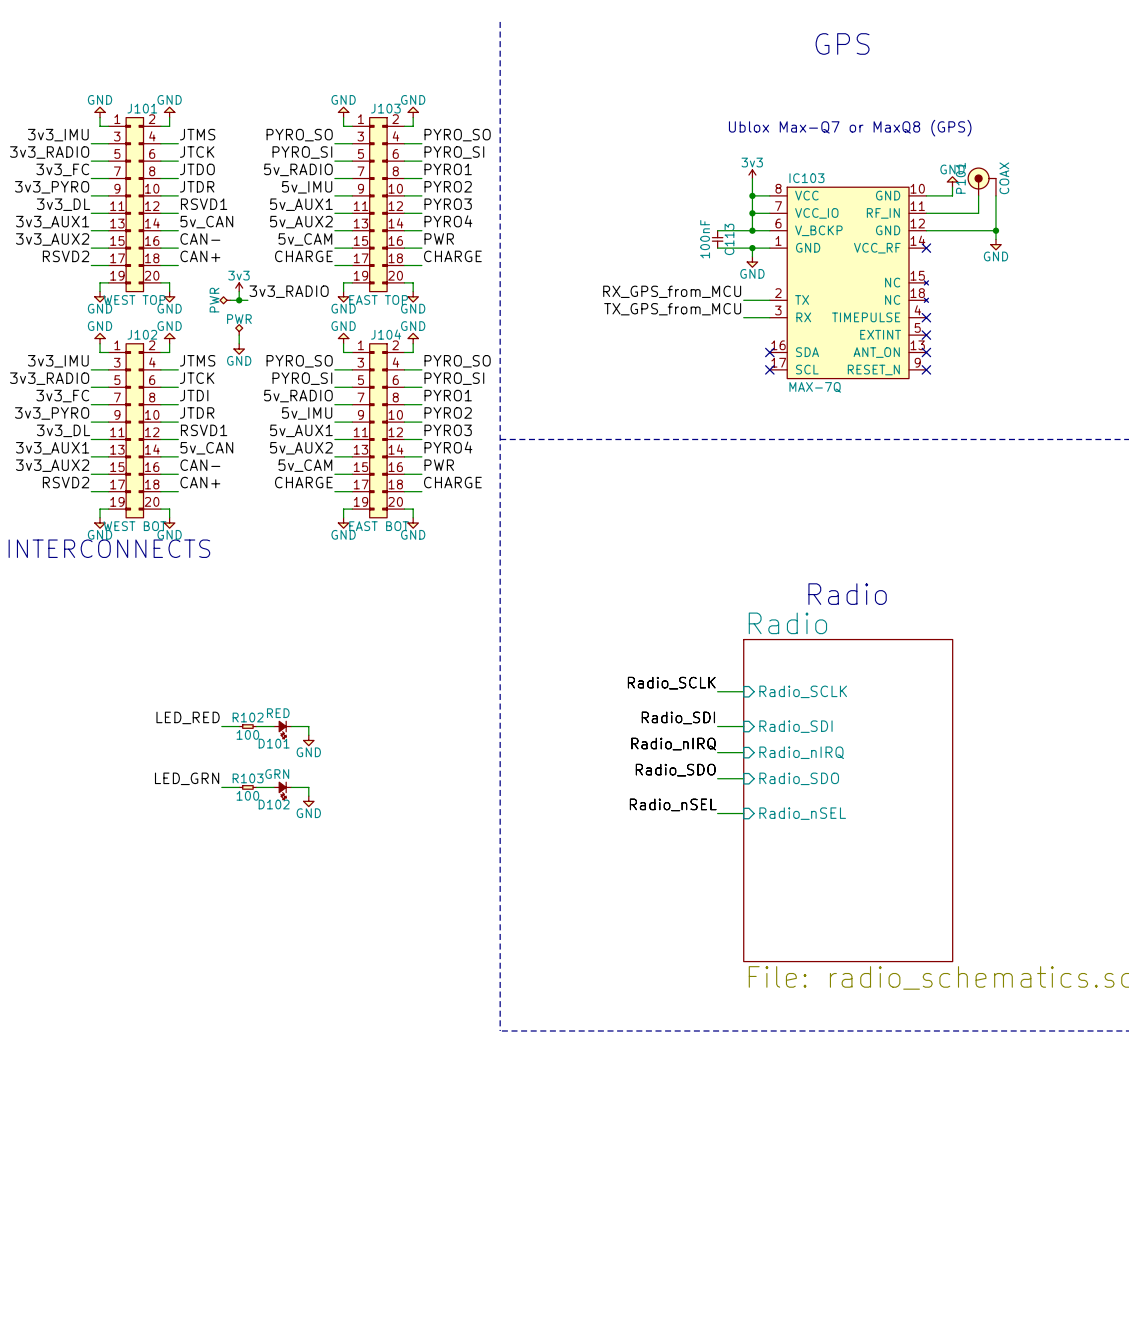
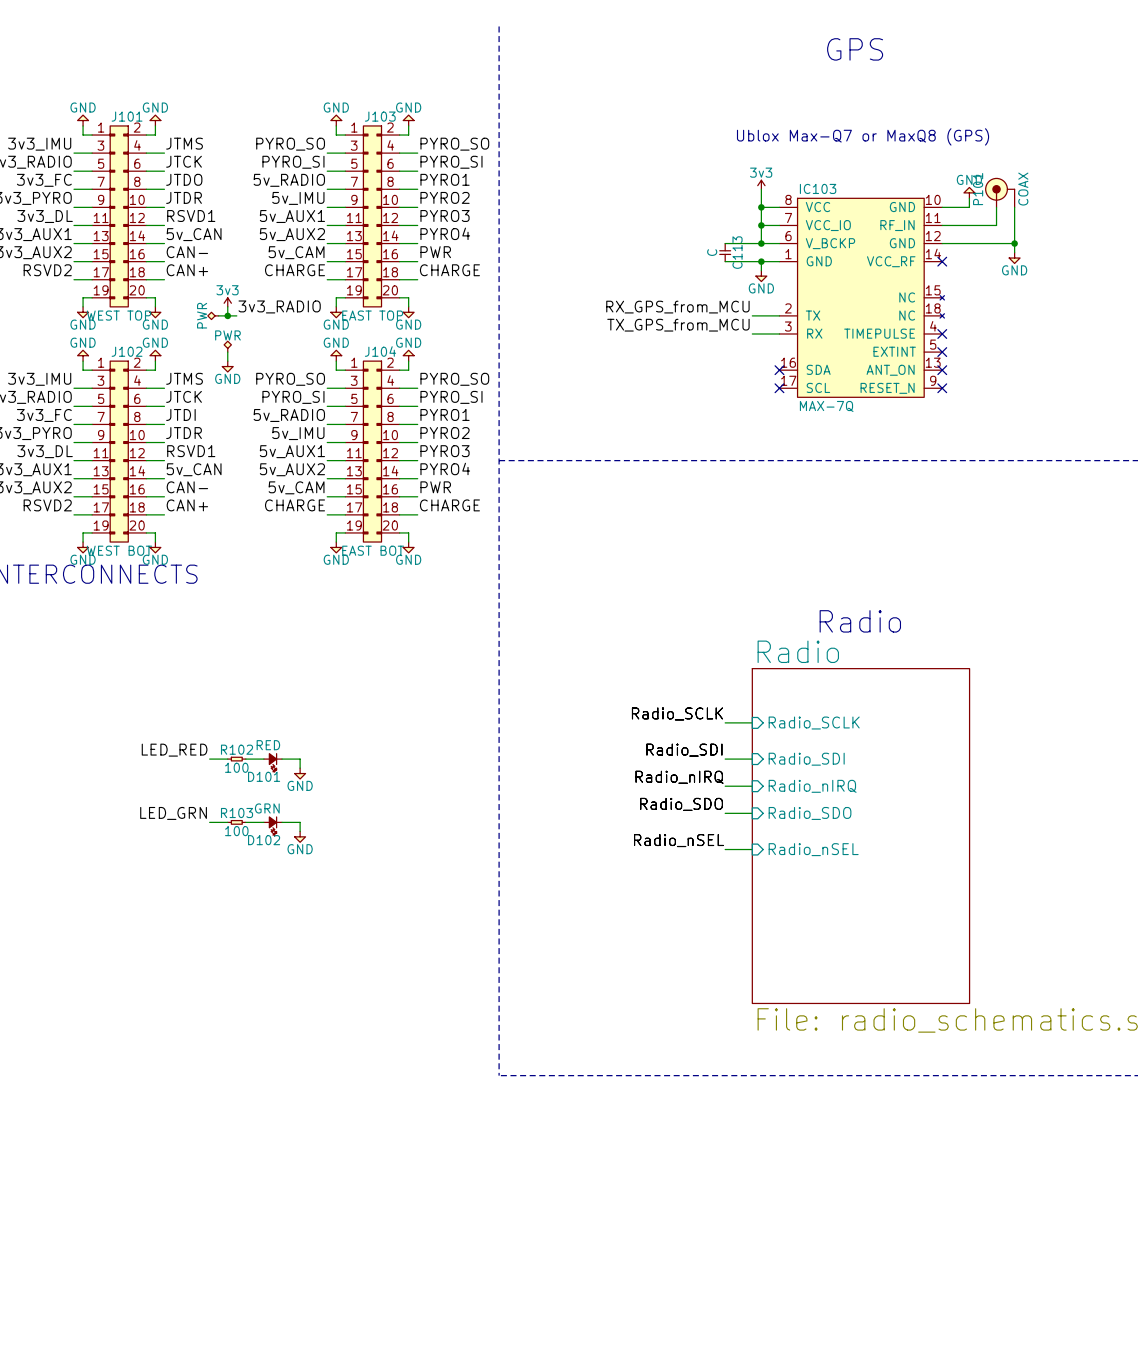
C113 value: 100nF (705, 239) -> C (712, 252)

